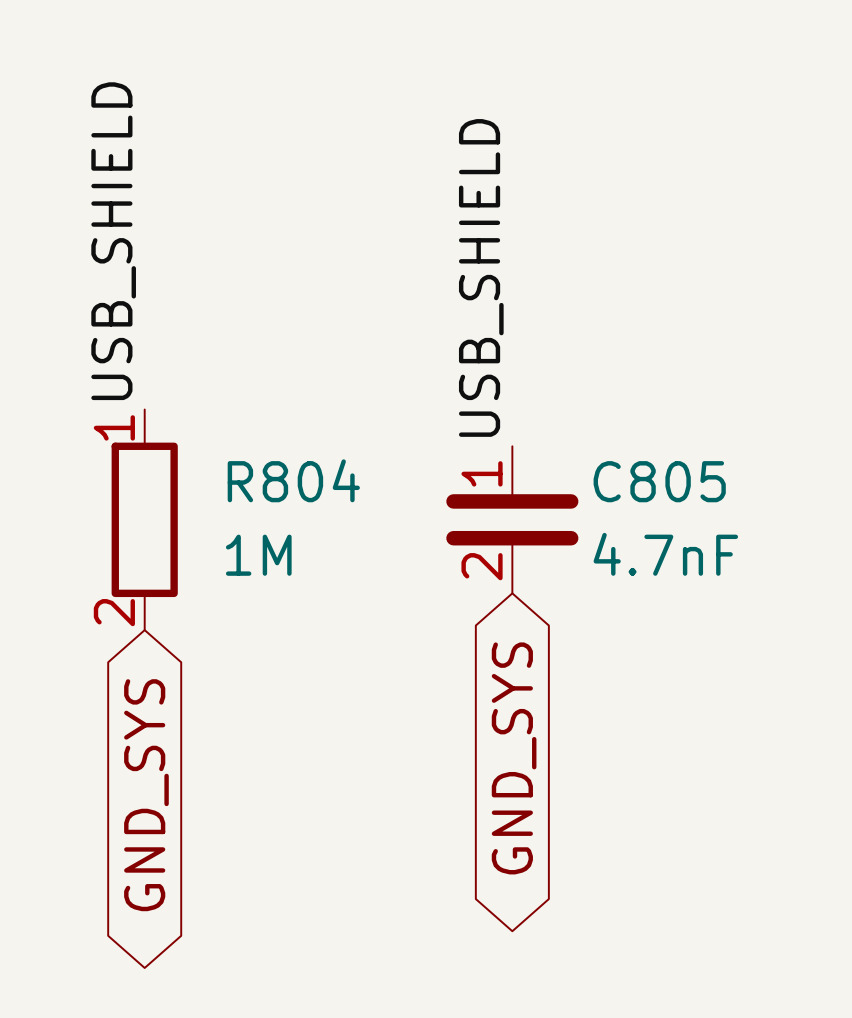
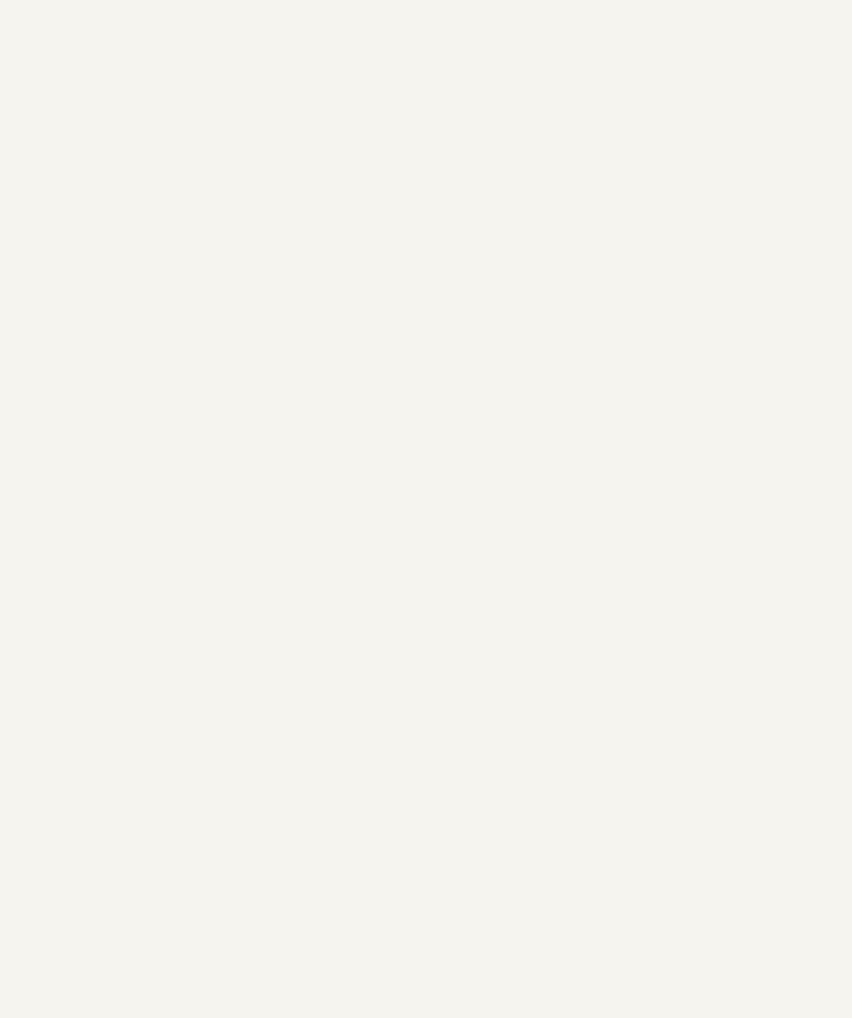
label: USB_SHIELD (113, 241) -> none
label: USB_SHIELD (481, 277) -> none
R804: 1M (144, 519) -> none
C805: 4.7nF (512, 519) -> none
global label: GND_SYS (514, 758) -> none
global label: GND_SYS (146, 795) -> none

